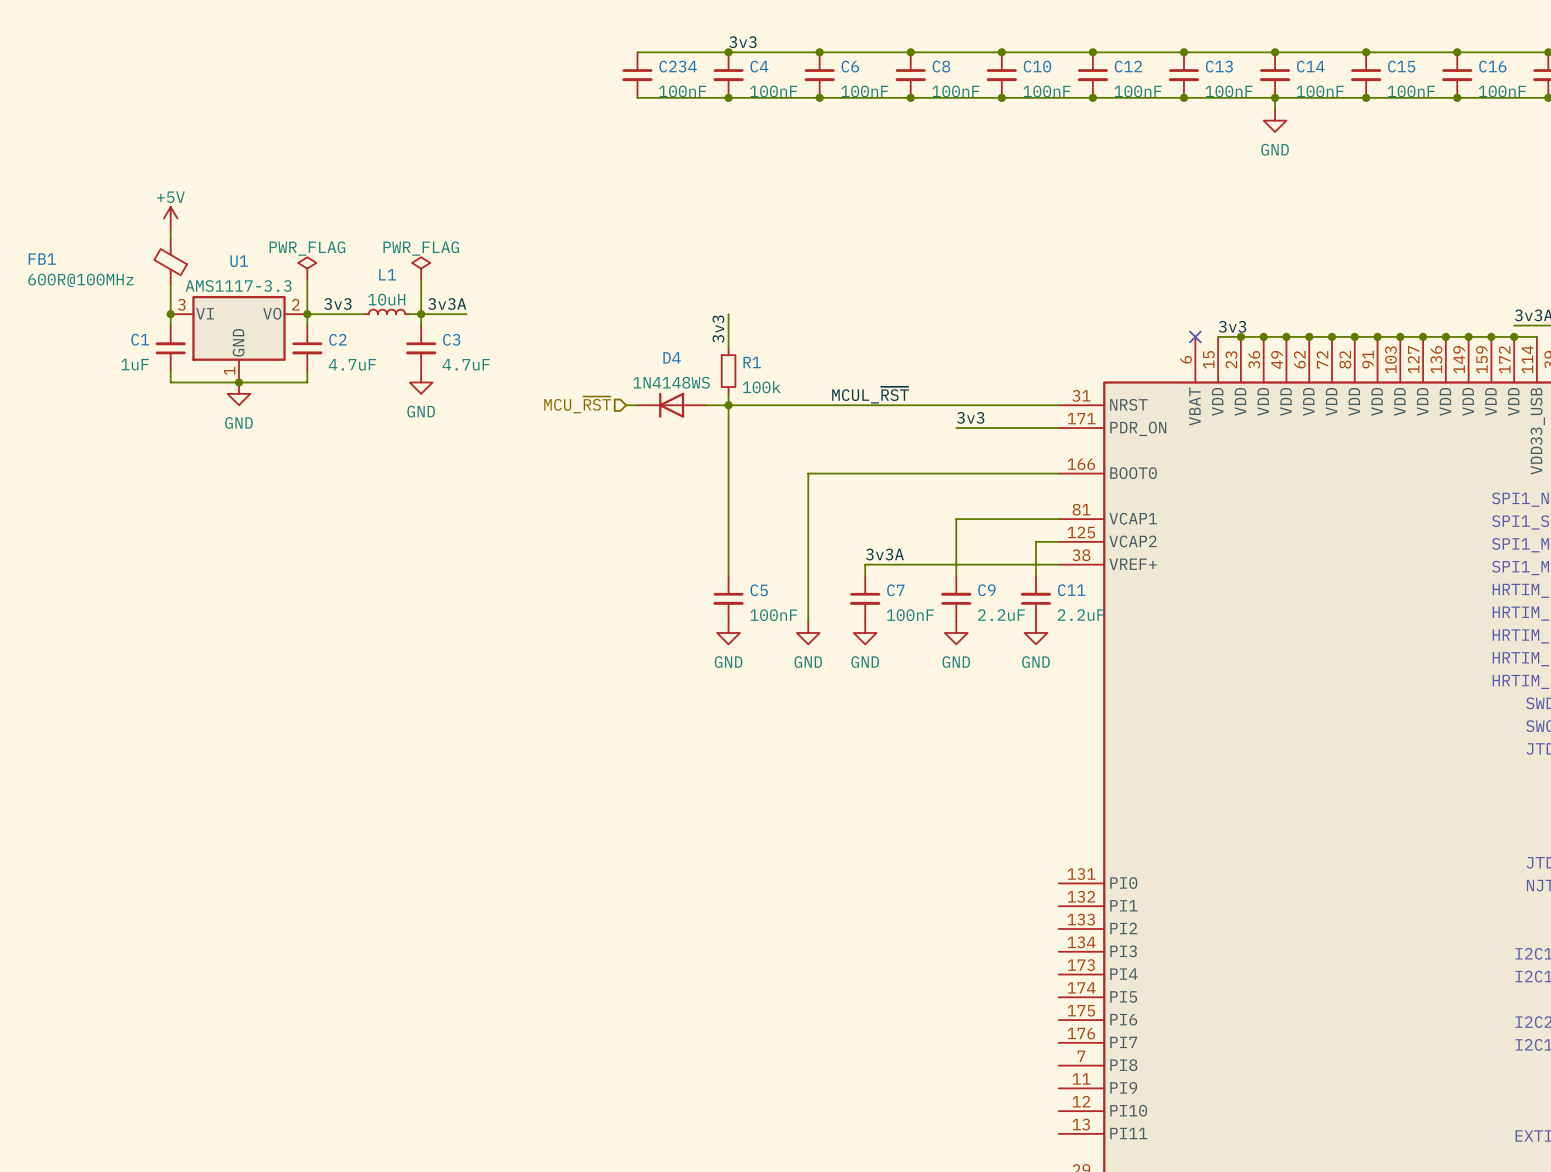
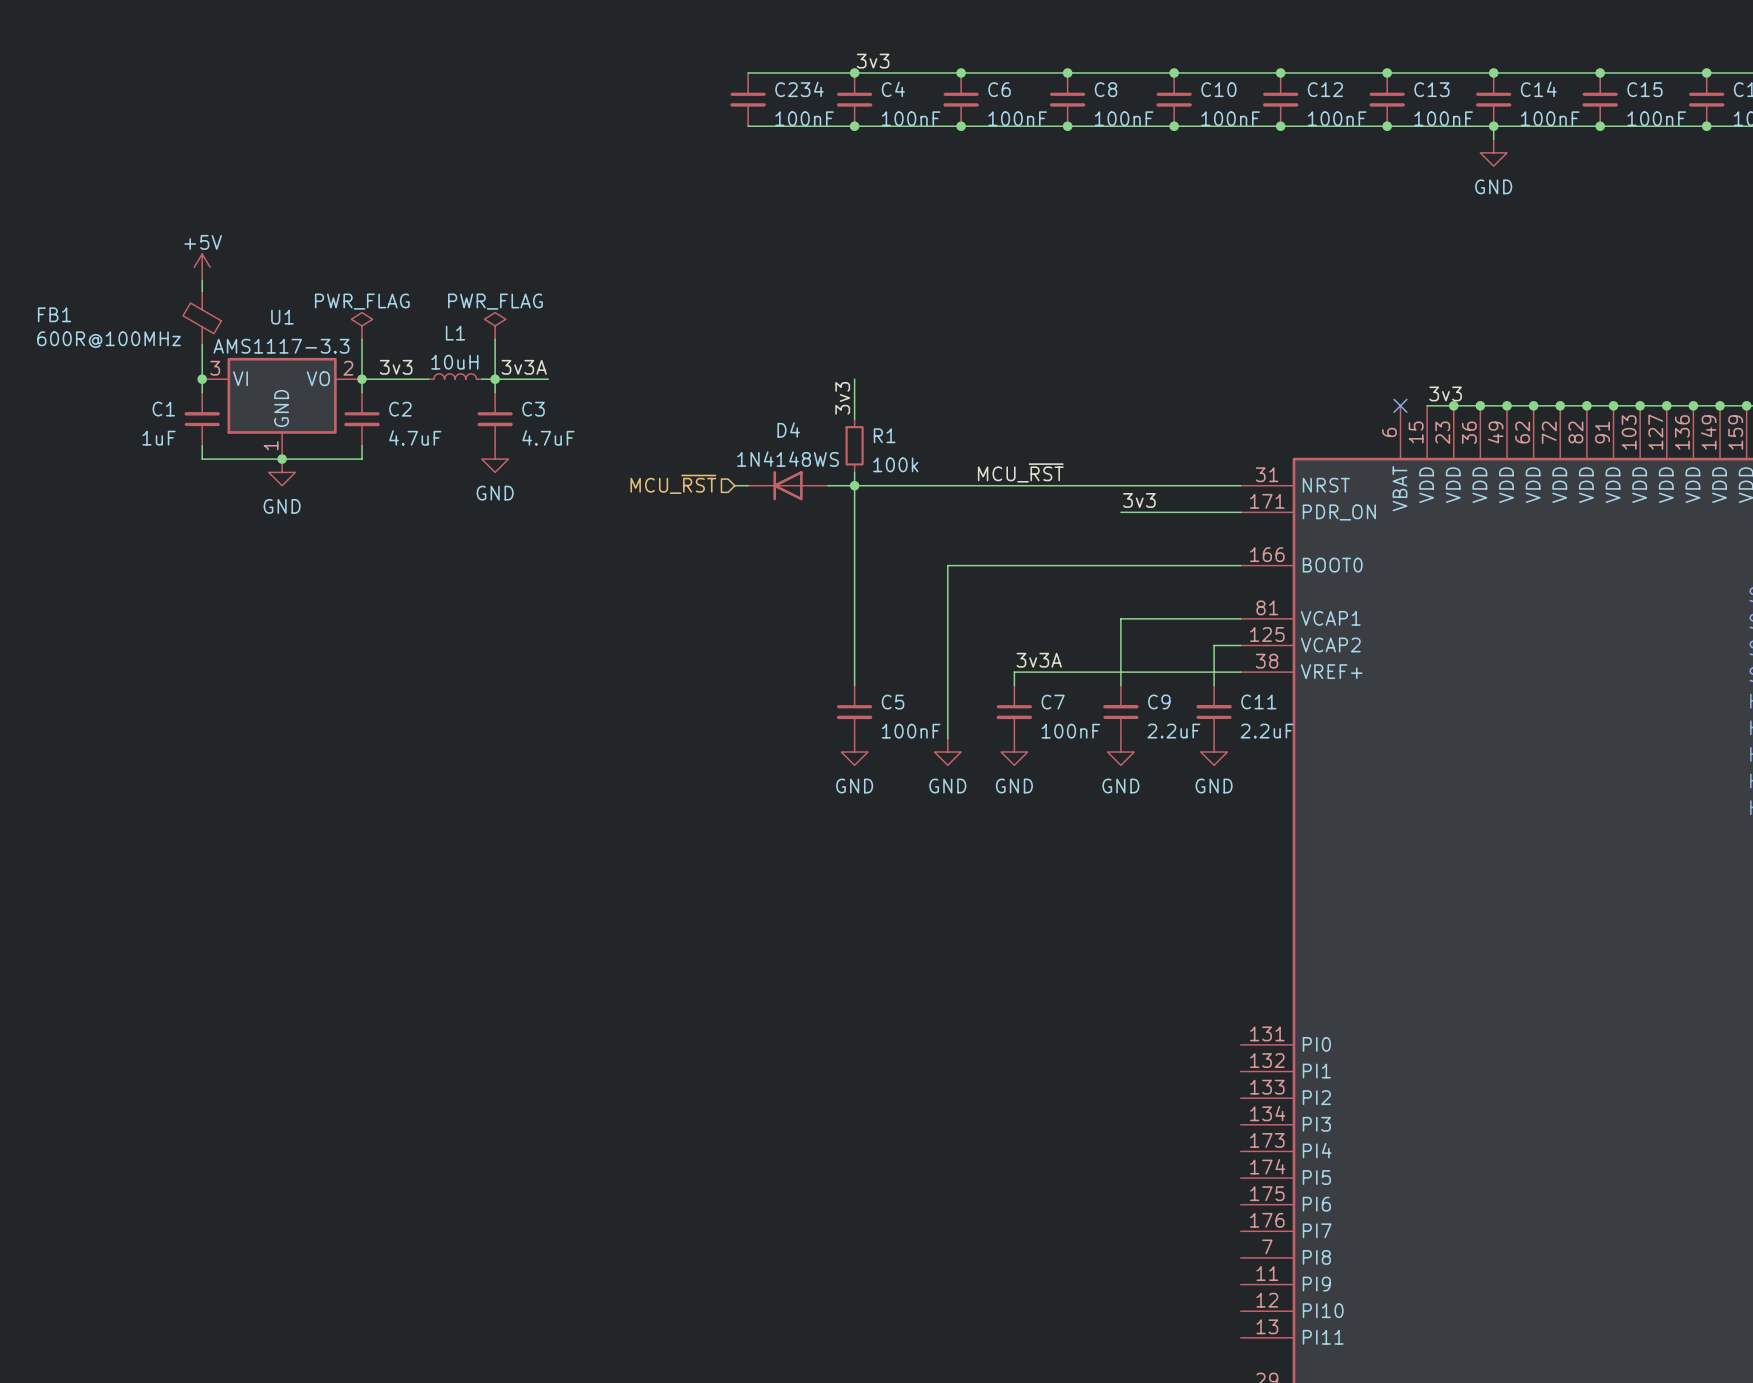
label: MCUL_~{RST} (870, 395) -> MCU_~{RST} (1020, 472)

